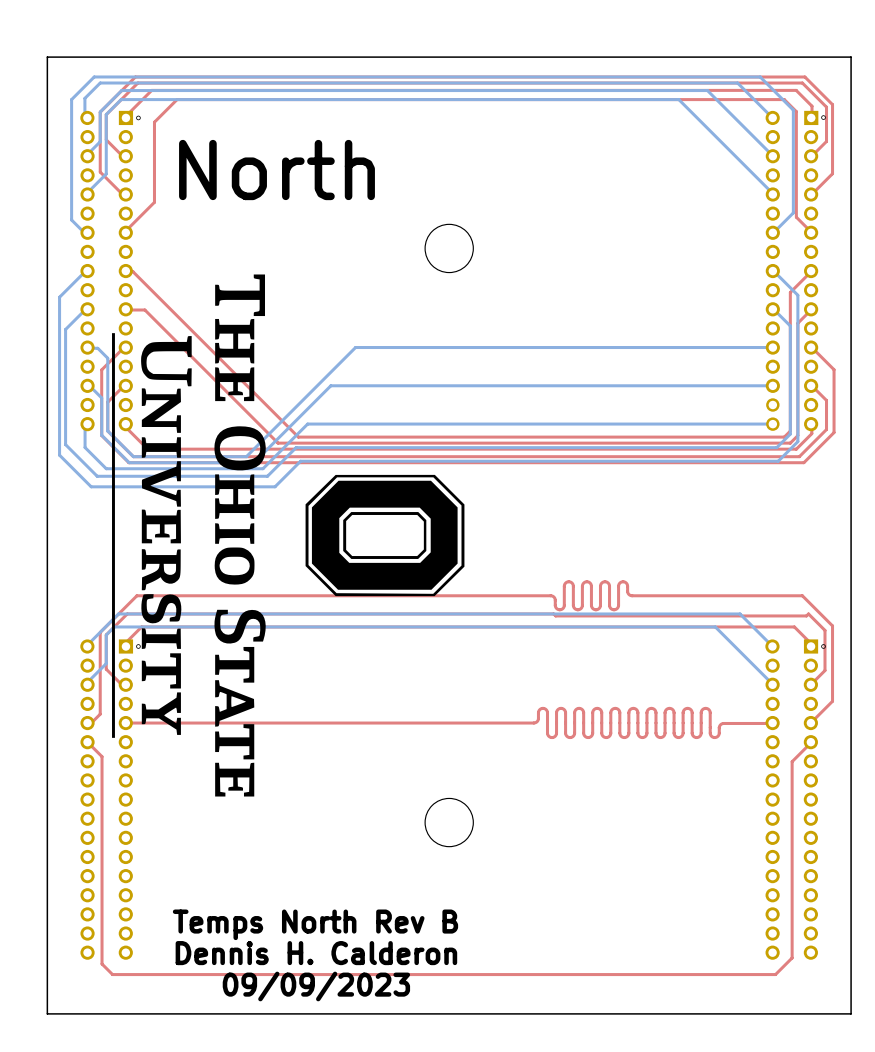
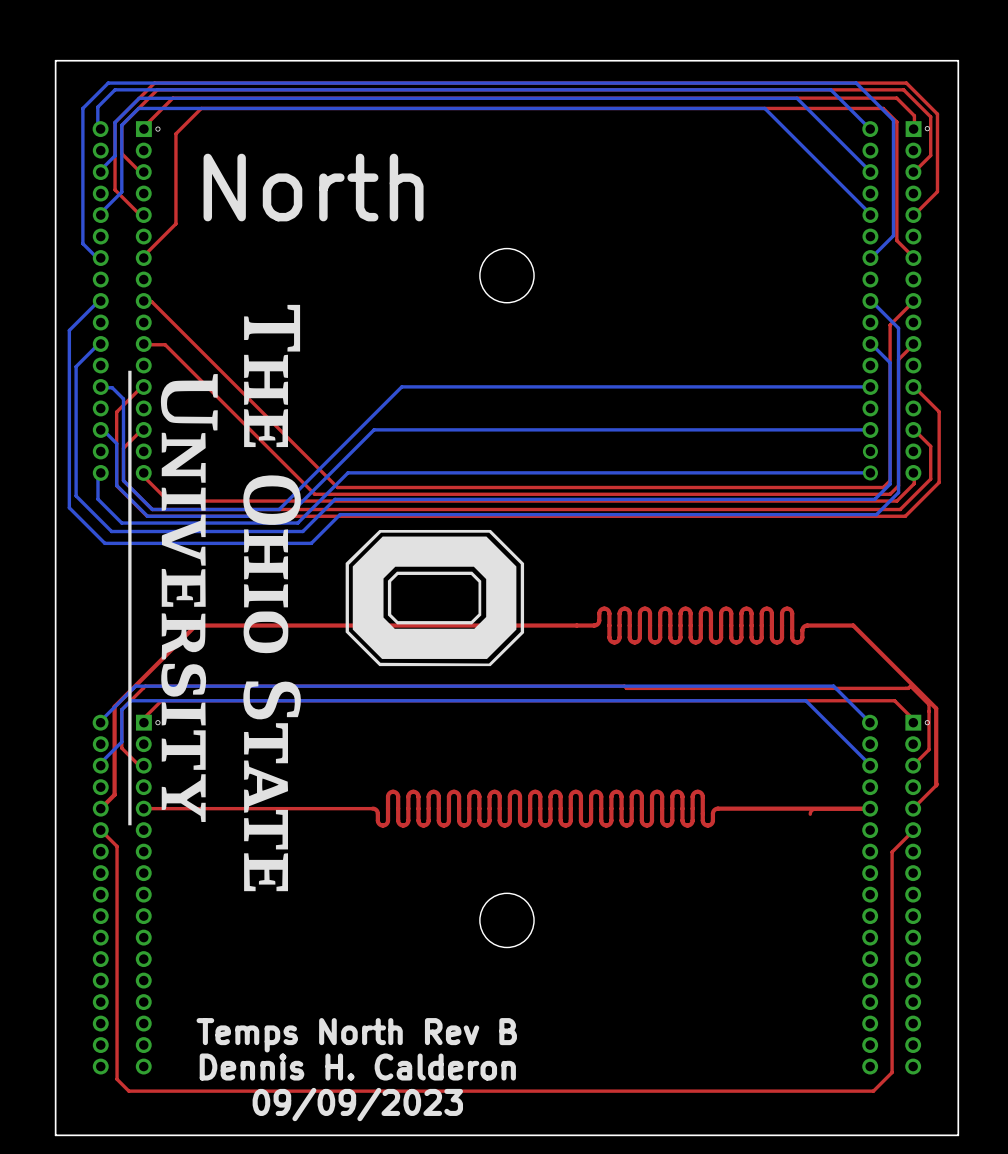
top track: (832, 701) (832, 625) (802, 595) (631, 595) (627, 592) (627, 584) (622, 581) (618, 585) (618, 606) (613, 609) (609, 605) (609, 585) (604, 581) (600, 585) (600, 606) (595, 609) (591, 606) (591, 585) (586, 581) (582, 585) (582, 606) (577, 609) (573, 605) (573, 585) (568, 581) (564, 585) (564, 606) (559, 609) (555, 606) (554, 598) (550, 595) (136, 595) (100, 632) (100, 714) (91, 723) (83, 723) -> none
top track: none -> (936, 785) (936, 708) (853, 625) (806, 625) (802, 629) (801, 639) (795, 642) (792, 638) (792, 612) (785, 608) (782, 613) (781, 638) (776, 642) (771, 638) (771, 612) (766, 608) (761, 613) (761, 638) (755, 642) (751, 638) (751, 612) (745, 608) (741, 613) (741, 638) (735, 642) (731, 638) (731, 612) (725, 608) (721, 613) (720, 638) (715, 642) (711, 638) (710, 612) (705, 608) (700, 613) (700, 638) (695, 642) (690, 638) (690, 612) (684, 608) (680, 613) (680, 638) (674, 642) (670, 638) (670, 612) (664, 608) (660, 613) (660, 638) (654, 642) (650, 638) (649, 612) (644, 608) (639, 613) (639, 638) (634, 642) (629, 638) (629, 612) (623, 608) (619, 613) (619, 638) (613, 642) (609, 638) (609, 612) (604, 608) (599, 611) (598, 623) (594, 625) (195, 625) (114, 706) (114, 794) (100, 808)
top track: (533, 722) (538, 720) (539, 710) (545, 709) (547, 734) (550, 737) (554, 736) (556, 733) (556, 711) (559, 708) (562, 708) (565, 712) (565, 734) (571, 737) (574, 733) (574, 711) (580, 708) (583, 712) (583, 734) (589, 737) (592, 733) (592, 711) (598, 708) (601, 712) (601, 734) (606, 737) (610, 733) (610, 711) (615, 708) (619, 712) (619, 734) (624, 737) (628, 733) (629, 711) (633, 708) (637, 712) (638, 734) (643, 737) (646, 733) (647, 711) (652, 708) (655, 712) (656, 734) (661, 737) (664, 733) (665, 711) (670, 708) (674, 712) (674, 734) (679, 737) (683, 733) (683, 711) (688, 708) (692, 712) (692, 734) (697, 737) (701, 733) (701, 711) (705, 708) (710, 711) (712, 736) (718, 735) (719, 727) -> none
top track: (533, 723) (329, 723) -> (870, 808) (717, 808) (713, 811) (712, 822) (707, 825) (702, 821) (702, 795) (697, 791) (692, 796) (692, 821) (687, 825) (682, 821) (682, 795) (677, 791) (672, 796) (672, 821) (667, 825) (662, 821) (661, 795) (657, 791) (652, 796) (651, 821) (646, 825) (641, 821) (641, 795) (636, 791) (631, 795) (631, 821) (626, 825) (621, 821) (621, 796) (617, 791) (611, 795) (611, 821) (606, 825) (601, 821) (601, 796) (596, 791) (591, 795) (591, 821) (586, 825) (581, 821) (580, 796) (576, 791) (570, 795) (570, 821) (566, 825) (560, 821) (560, 796) (556, 791) (550, 795) (550, 821) (546, 825) (540, 821) (540, 796) (535, 791) (530, 795) (530, 821) (525, 825) (520, 821) (519, 796) (515, 791) (510, 795) (509, 821) (505, 825) (499, 821) (499, 796) (495, 791) (489, 795) (489, 821) (485, 825) (479, 821) (479, 796) (474, 791) (469, 795) (469, 821) (464, 825) (459, 821) (459, 796) (454, 791) (449, 795) (448, 821) (445, 825) (438, 821) (438, 796) (435, 791) (428, 795) (428, 821) (424, 825) (418, 821) (418, 796) (414, 791) (408, 795) (408, 821) (405, 825) (401, 825) (398, 821) (398, 796) (395, 792) (391, 792) (388, 795) (387, 821) (386, 824) (378, 823) (377, 811) (372, 808)

